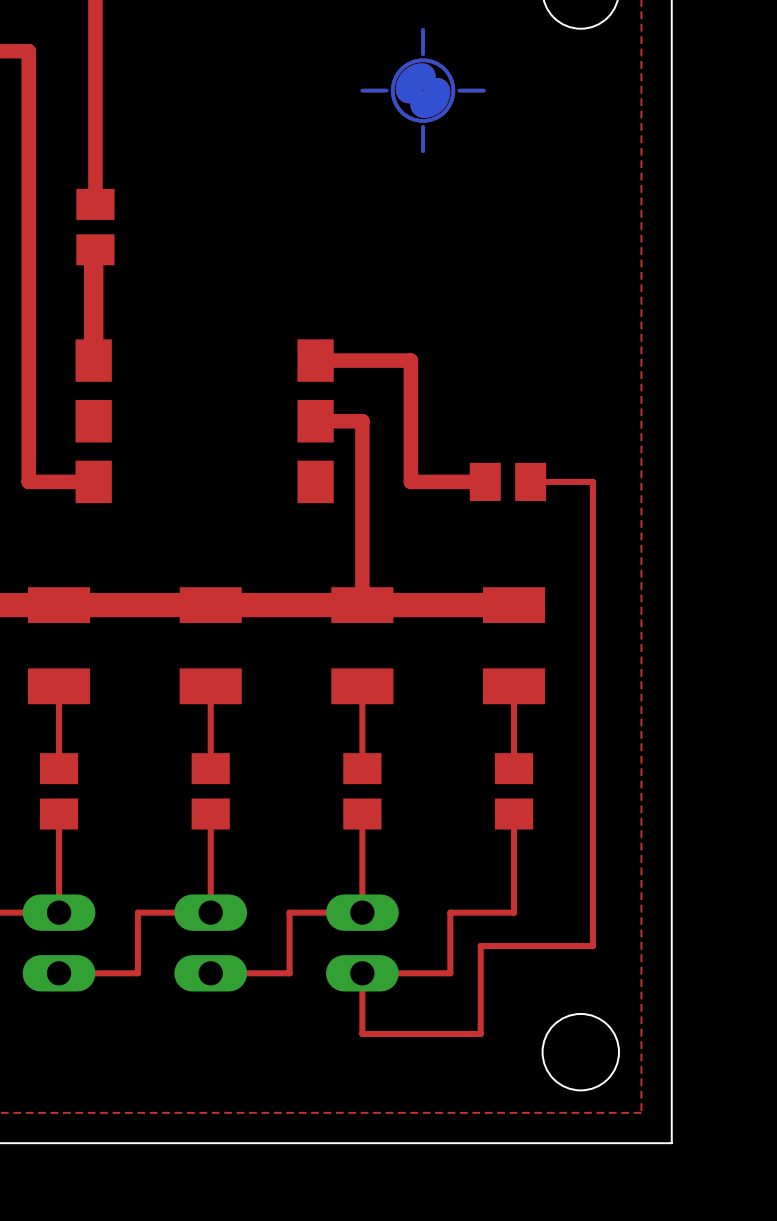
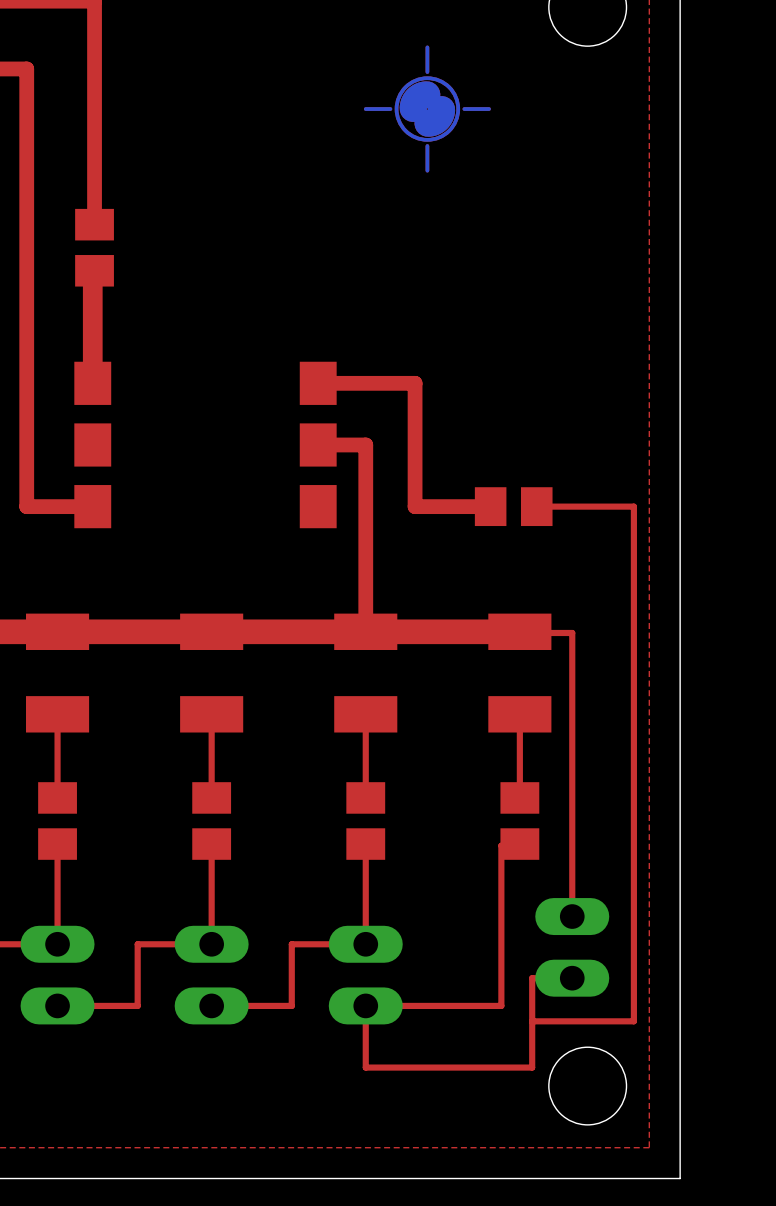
top track: (592, 481) (592, 946) (565, 946) -> (600, 506) (633, 506) (633, 1021) (532, 1021)
top track: none -> (495, 631) (572, 632) (572, 916)
top track: (514, 814) (514, 912) (450, 912) (450, 973) -> (519, 844) (501, 845) (501, 1005) (455, 1005)
part: none -> (572, 947)
top track: (526, 946) (480, 946) (480, 1033) -> (532, 978) (532, 1067) (485, 1067)

